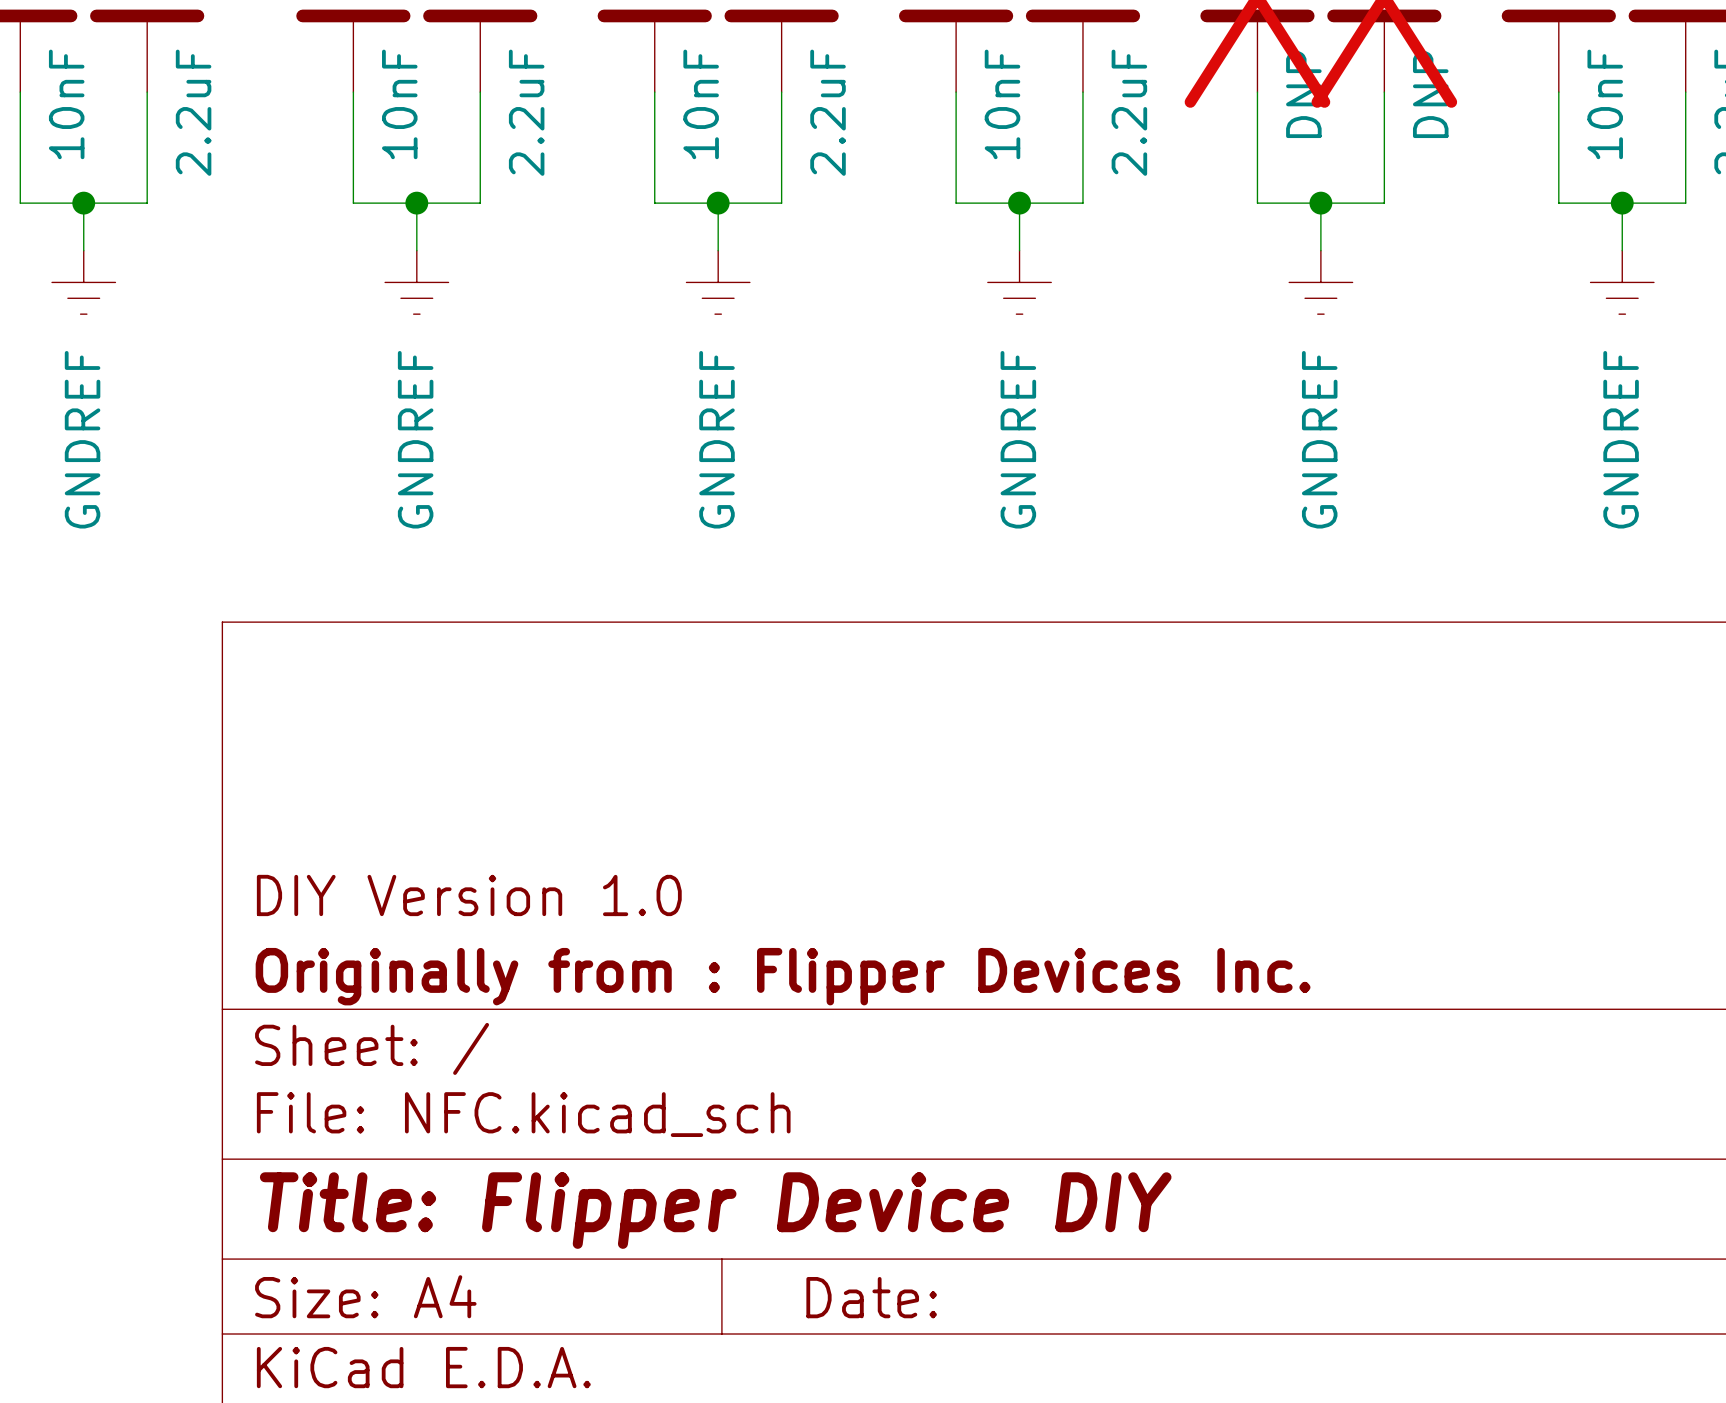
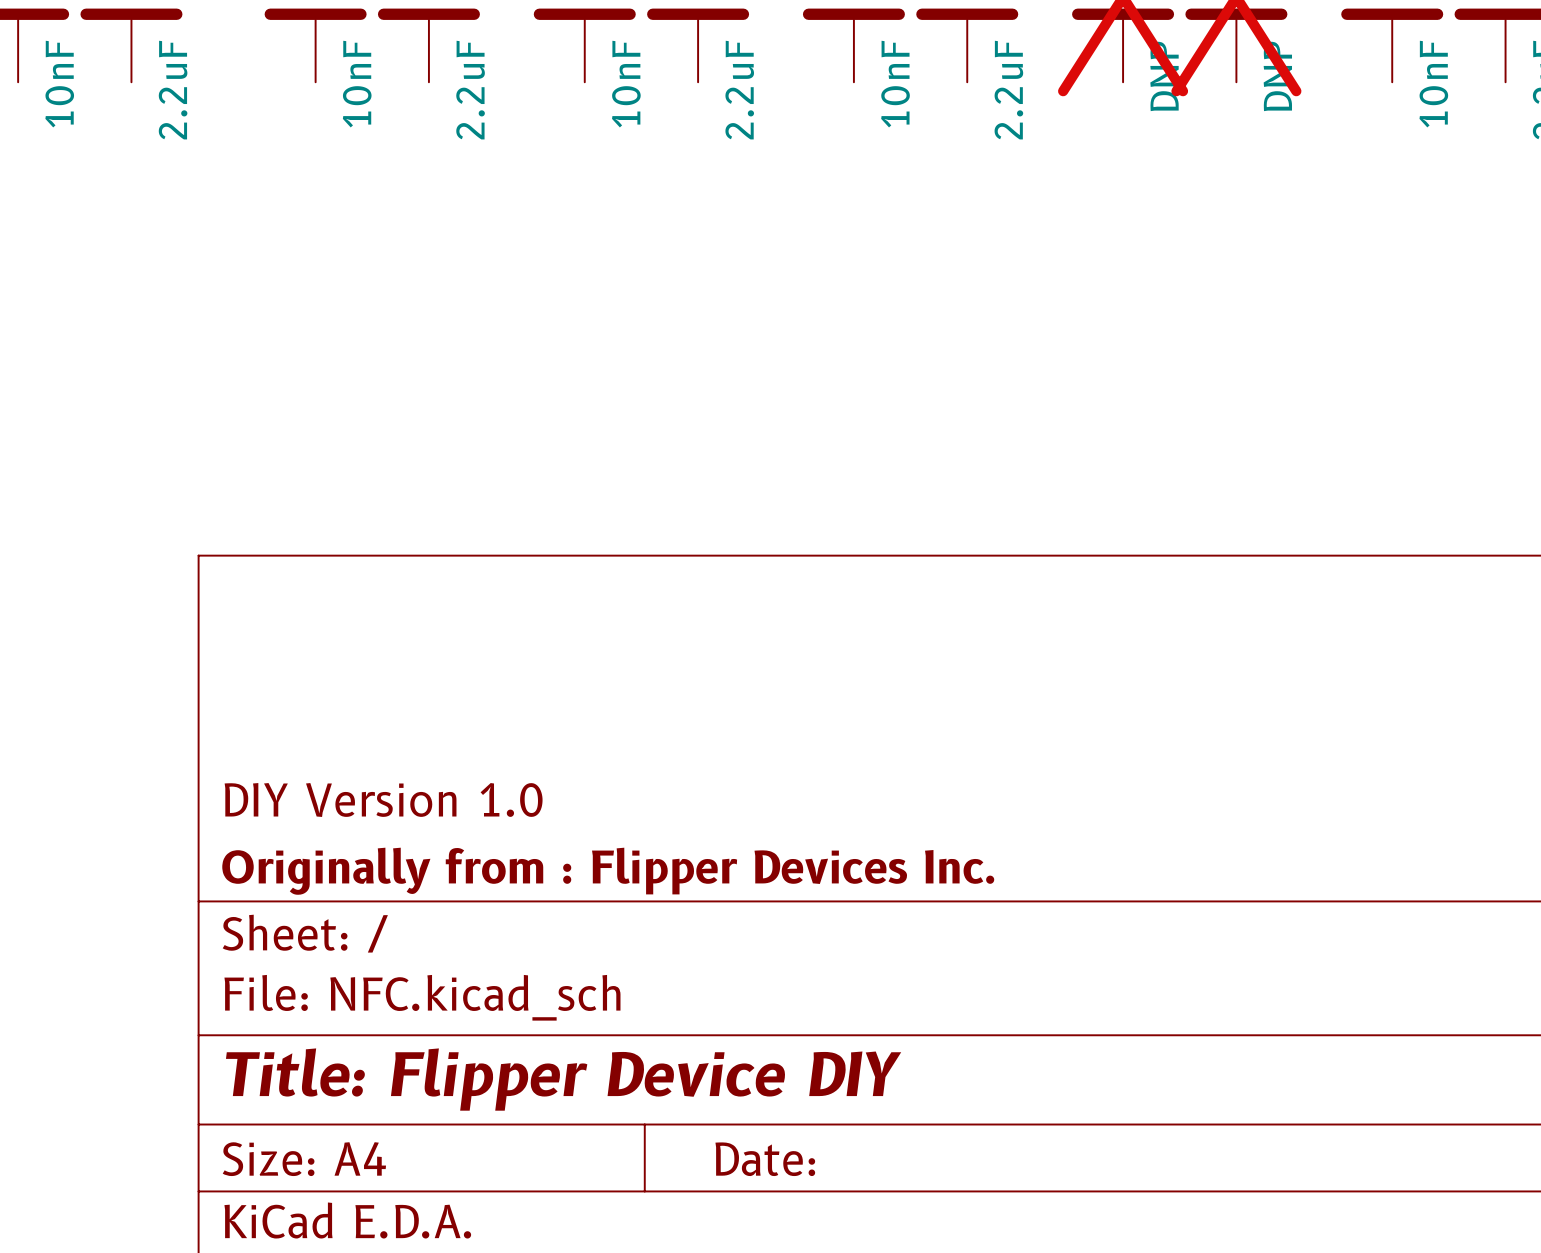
wire: (20, 92) (20, 203) (147, 203) (147, 92) -> none
wire: (353, 92) (353, 203) (480, 203) (480, 92) -> none
wire: (654, 92) (654, 203) (781, 203) (781, 92) -> none
wire: (956, 92) (956, 203) (1082, 203) (1082, 92) -> none
wire: (1257, 92) (1257, 203) (1384, 203) (1384, 92) -> none
wire: (1558, 92) (1558, 203) (1685, 203) (1685, 92) -> none
wire: (83, 203) (83, 250) -> none
junction: (83, 203) -> none
wire: (416, 203) (416, 250) -> none
junction: (416, 203) -> none
wire: (718, 203) (718, 250) -> none
junction: (718, 203) -> none
wire: (1019, 203) (1019, 250) -> none
junction: (1019, 203) -> none
wire: (1320, 203) (1320, 250) -> none
junction: (1320, 203) -> none
wire: (1622, 203) (1622, 250) -> none
junction: (1622, 203) -> none
power symbol: GNDREF (83, 282) -> none
power symbol: GNDREF (416, 282) -> none
power symbol: GNDREF (718, 282) -> none
power symbol: GNDREF (1019, 282) -> none
power symbol: GNDREF (1320, 282) -> none
power symbol: GNDREF (1622, 282) -> none

